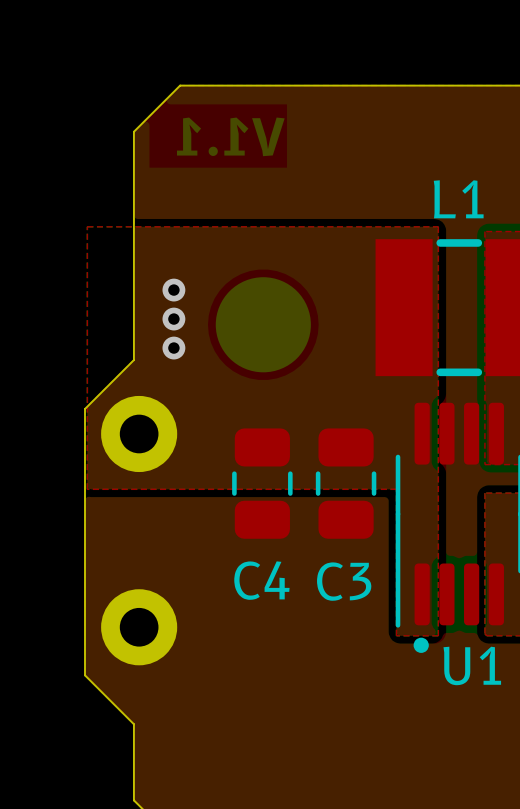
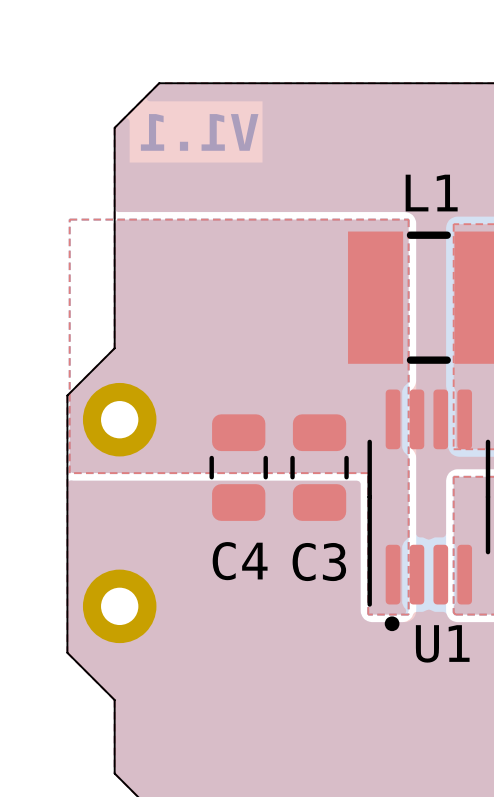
via: (173, 290) -> none
via: (173, 319) -> none
part: (263, 324) -> none
via: (173, 348) -> none

